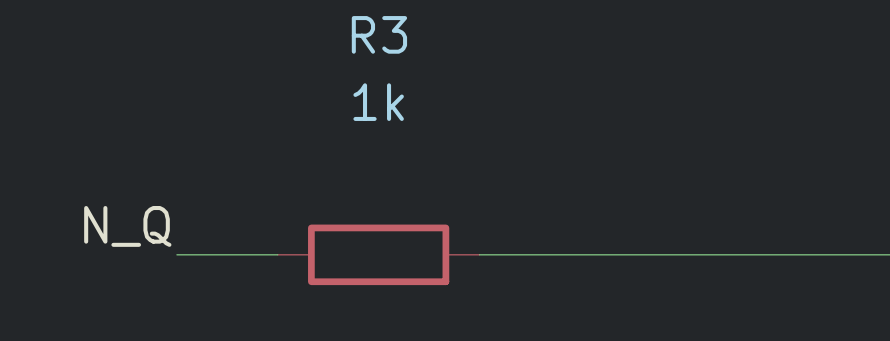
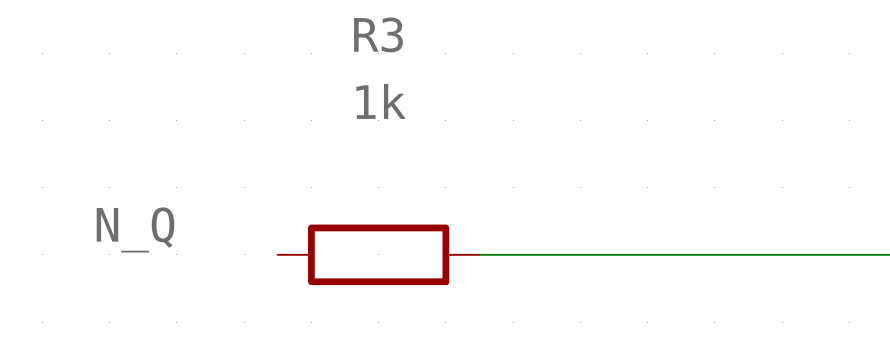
wire: (176, 254) (277, 254) -> none

